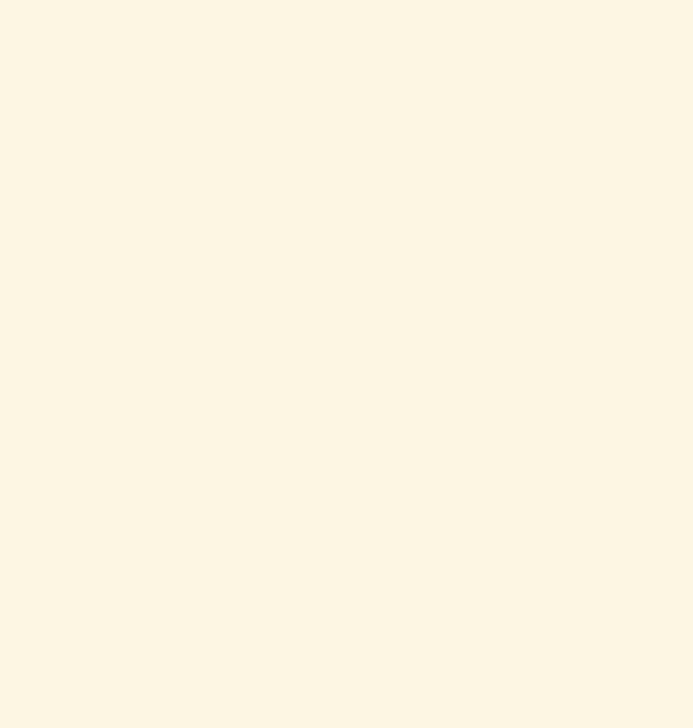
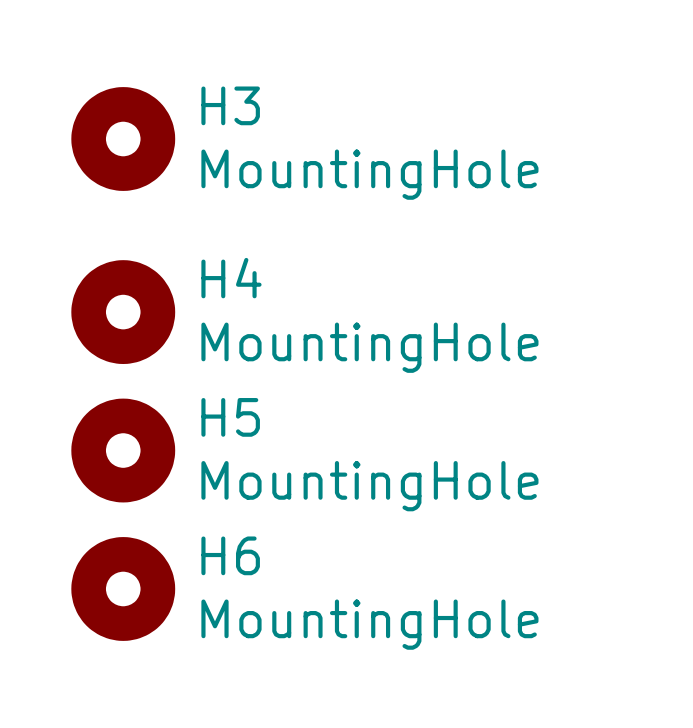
H3: none -> MountingHole (123, 139)
H4: none -> MountingHole (123, 312)
H5: none -> MountingHole (123, 450)
H6: none -> MountingHole (123, 588)

